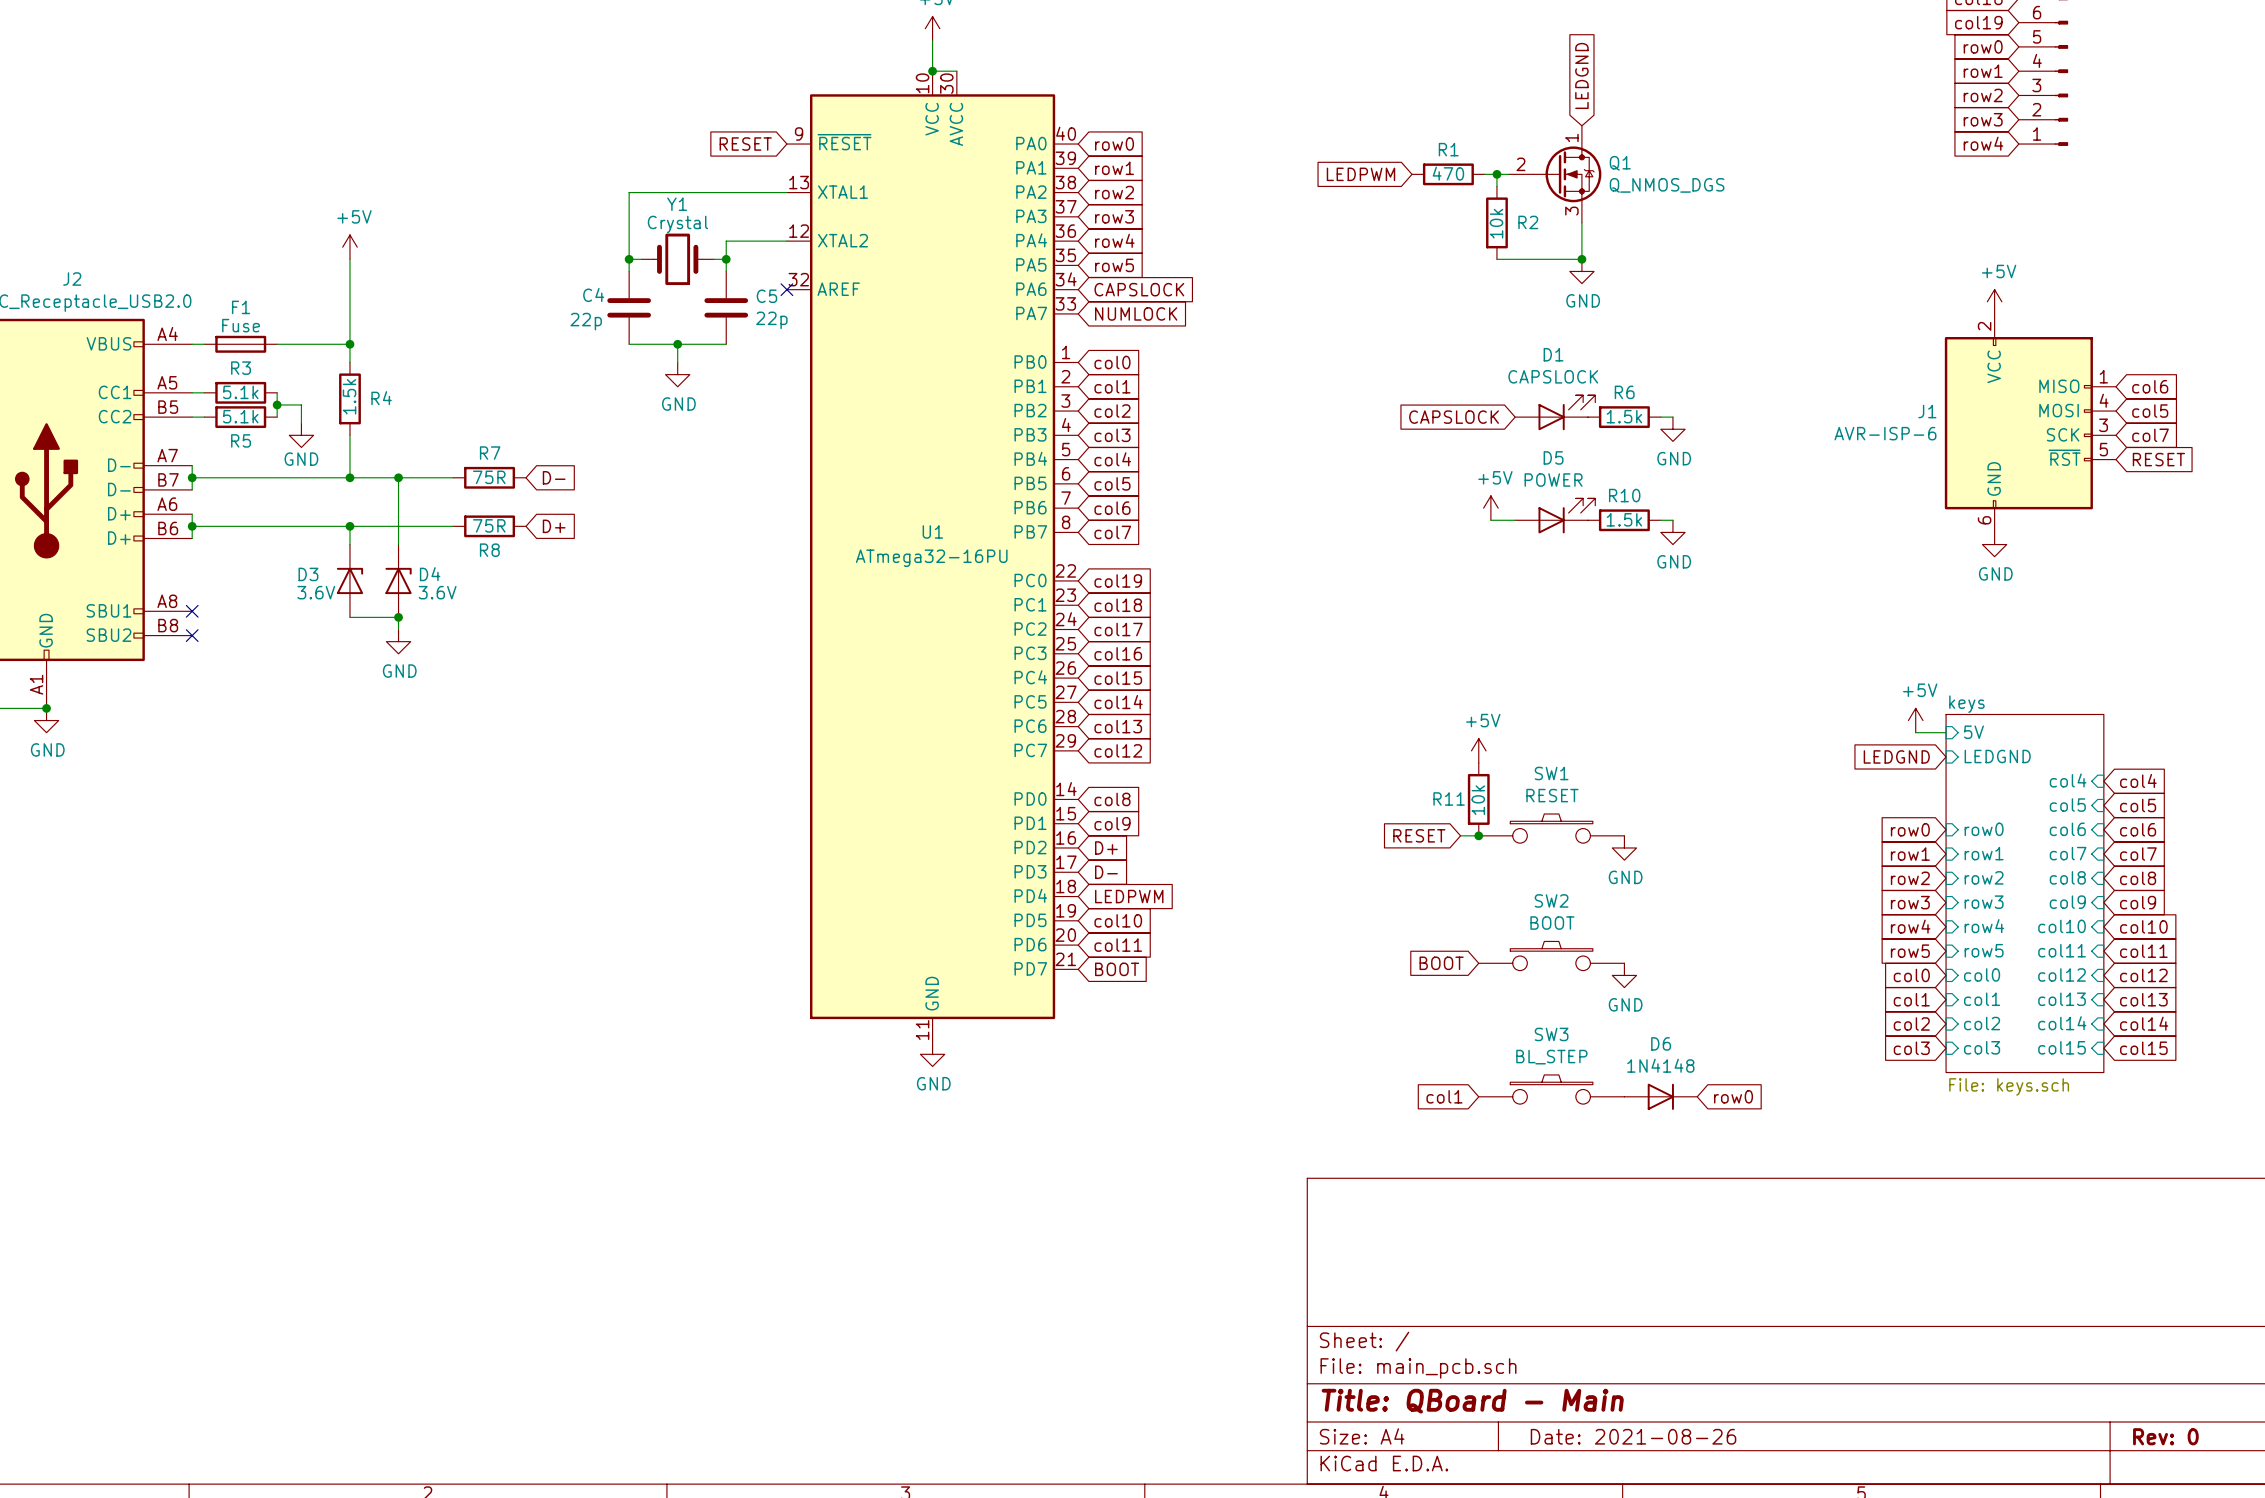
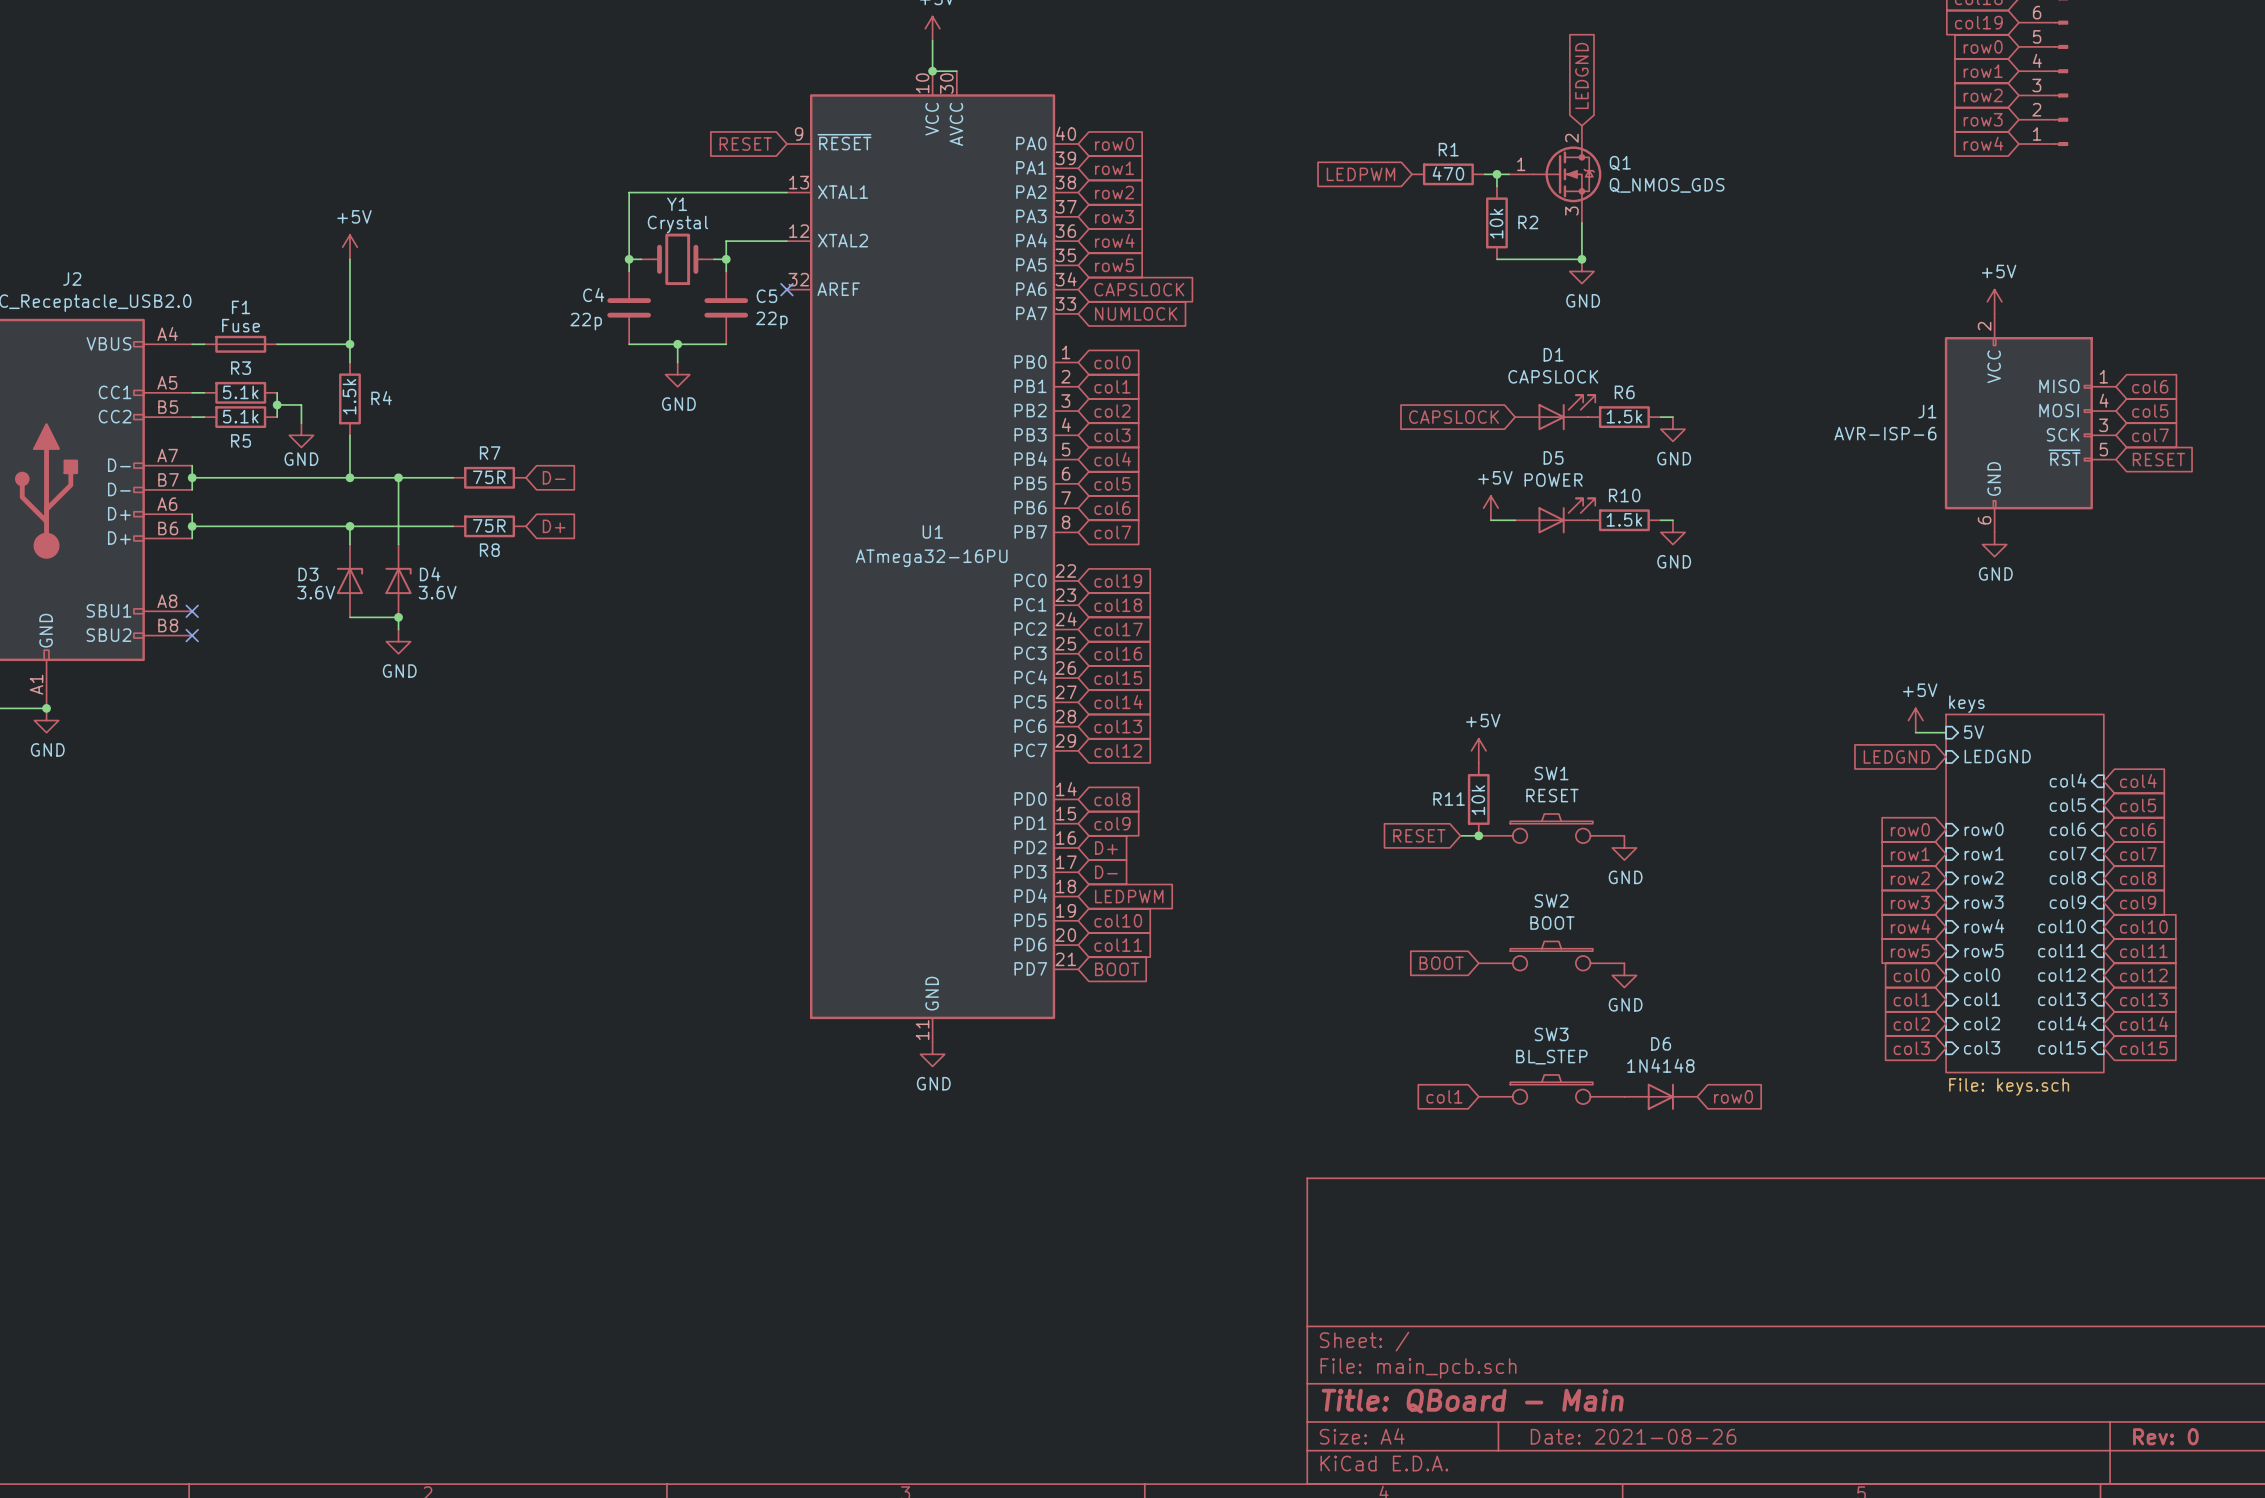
Q1 pin number: 1 (1571, 137) -> 2 (1571, 138)
Q1 pin number: 2 (1520, 164) -> 1 (1521, 164)
Q1 value: Q_NMOS_DGS (1667, 185) -> Q_NMOS_GDS (1667, 185)

